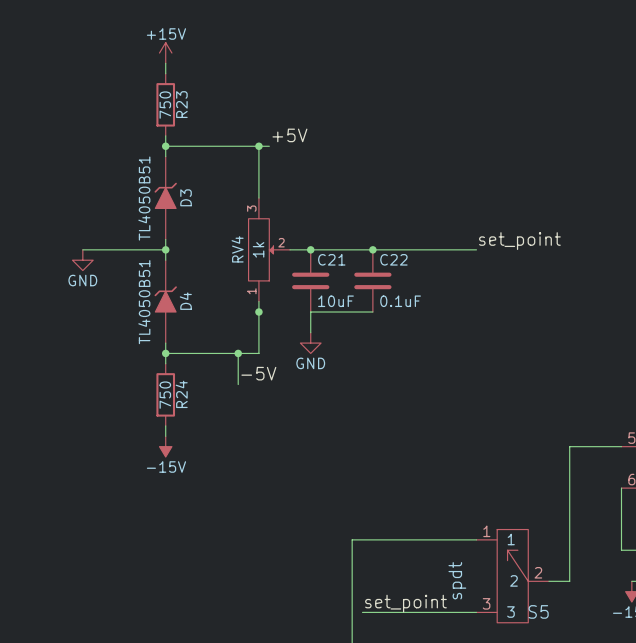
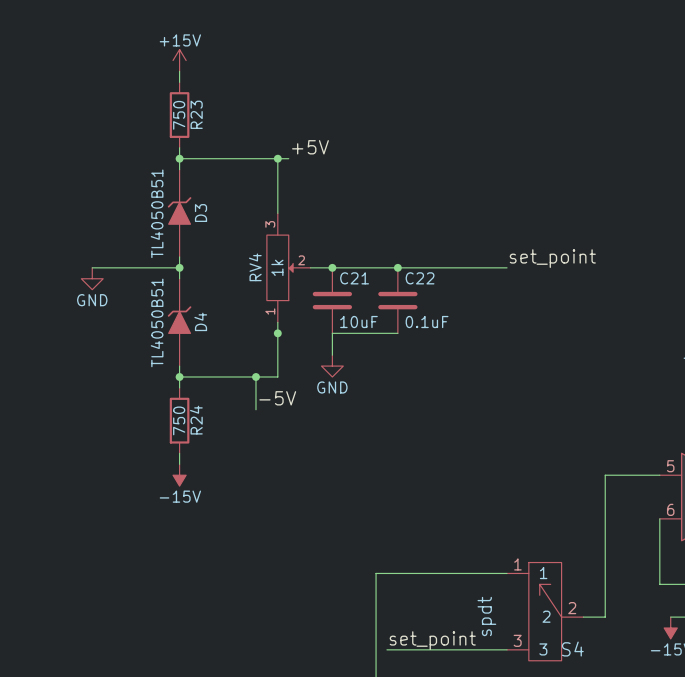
S5 name: S5 (538, 611) -> S4 (572, 649)

